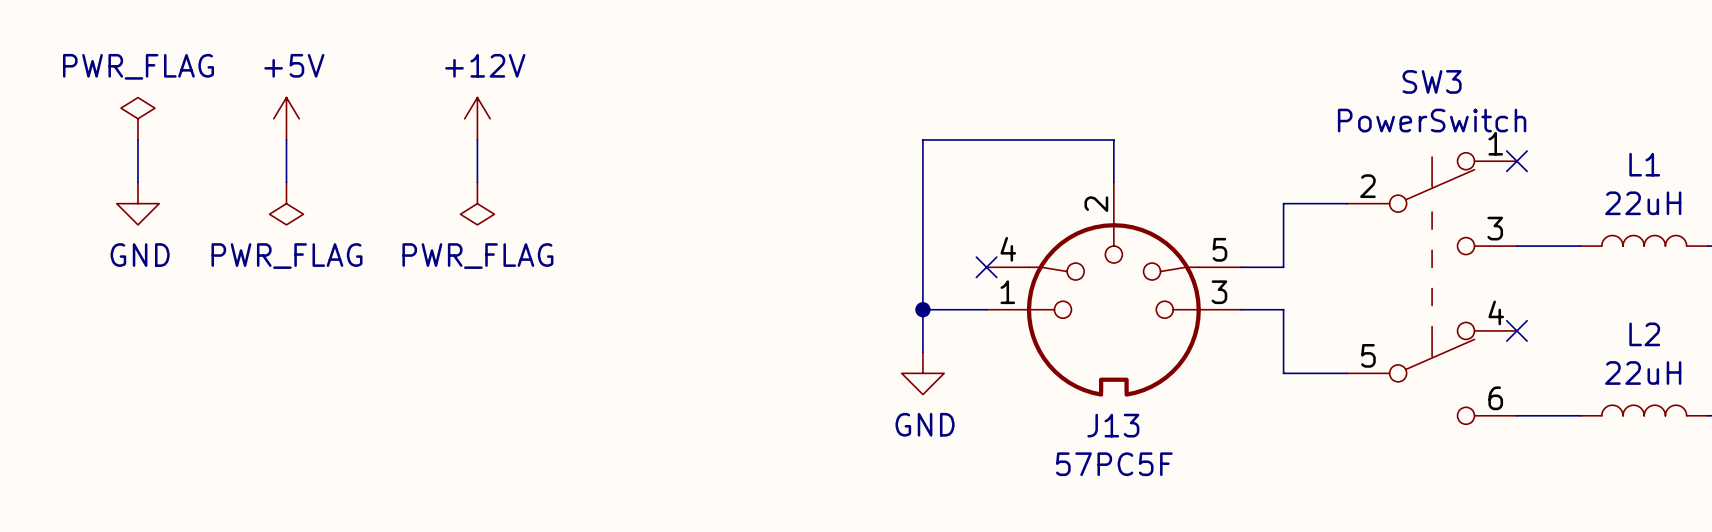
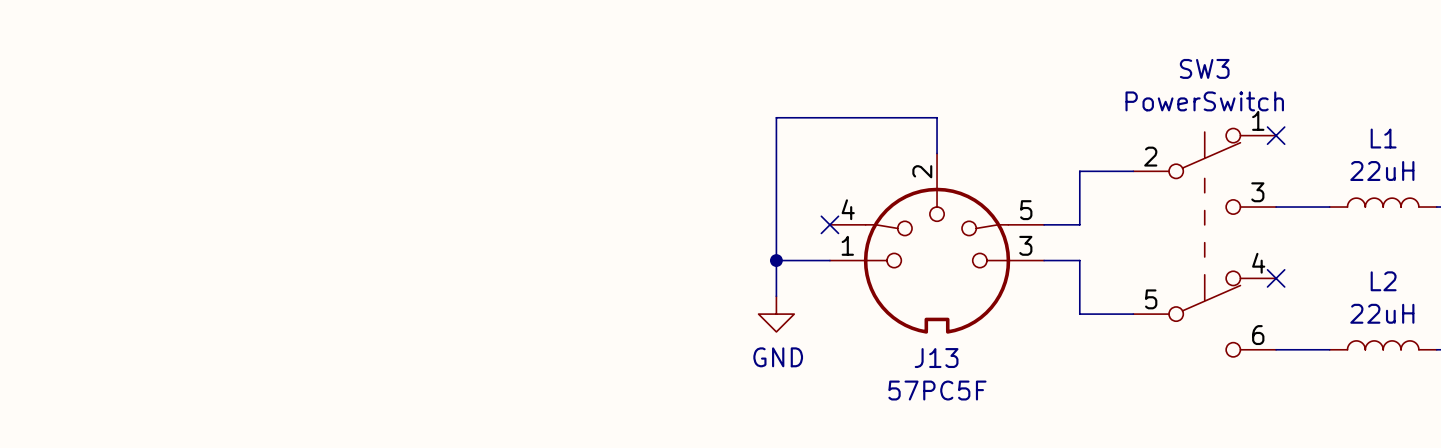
power symbol: PWR_FLAG (137, 118) -> none
power symbol: +5V (286, 118) -> none
power symbol: +12V (477, 118) -> none
wire: (137, 140) (137, 182) -> none
wire: (286, 140) (286, 182) -> none
wire: (477, 140) (477, 182) -> none
power symbol: GND (137, 203) -> none
power symbol: PWR_FLAG (286, 203) -> none
power symbol: PWR_FLAG (477, 203) -> none

